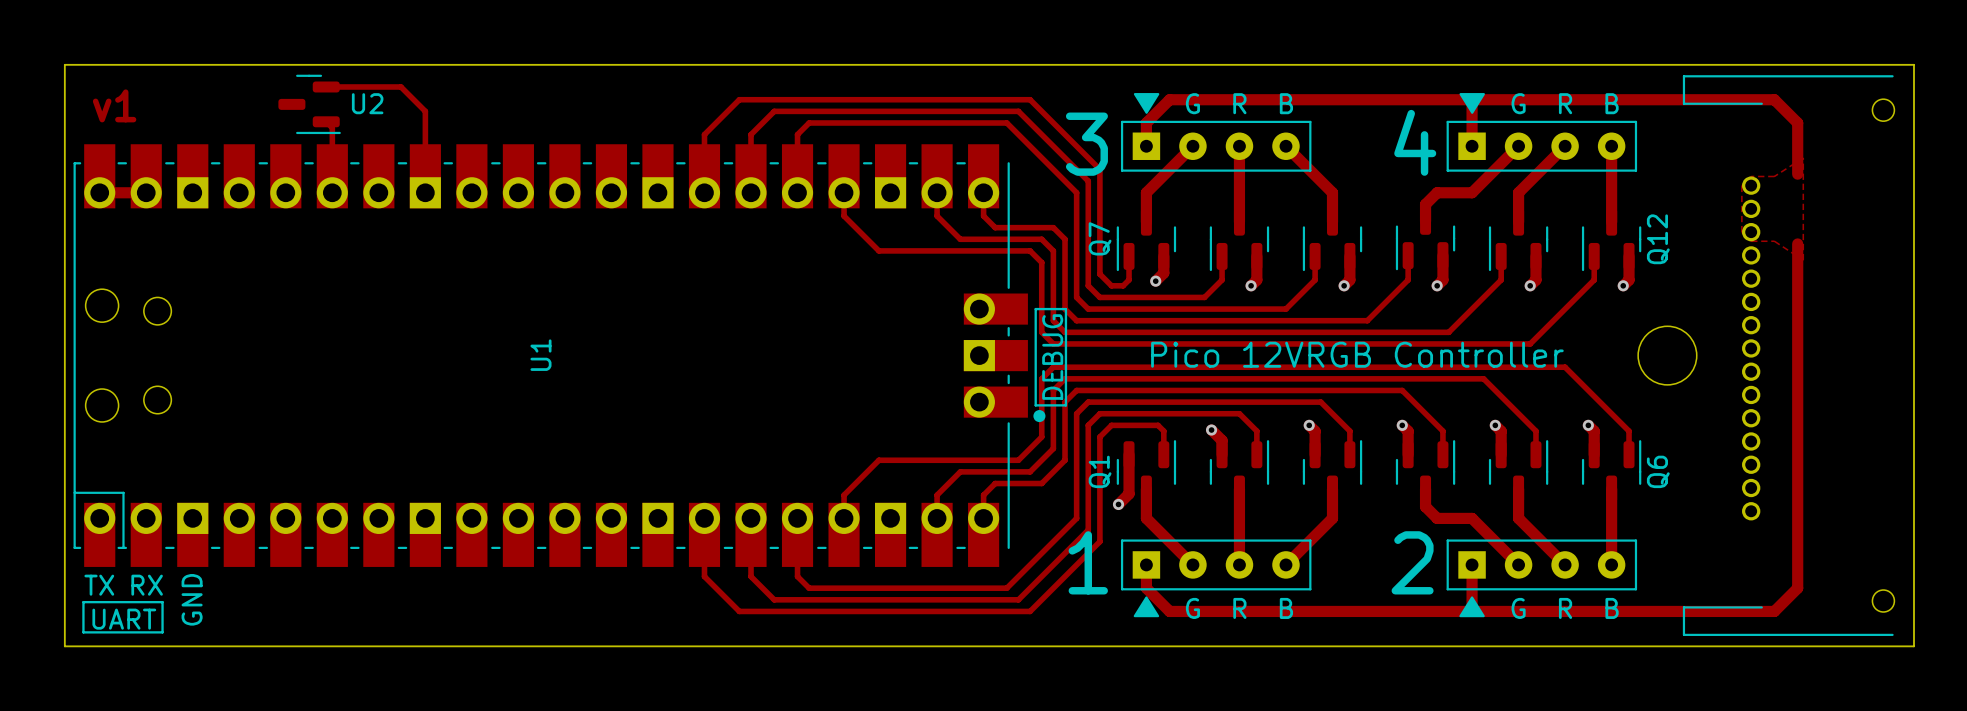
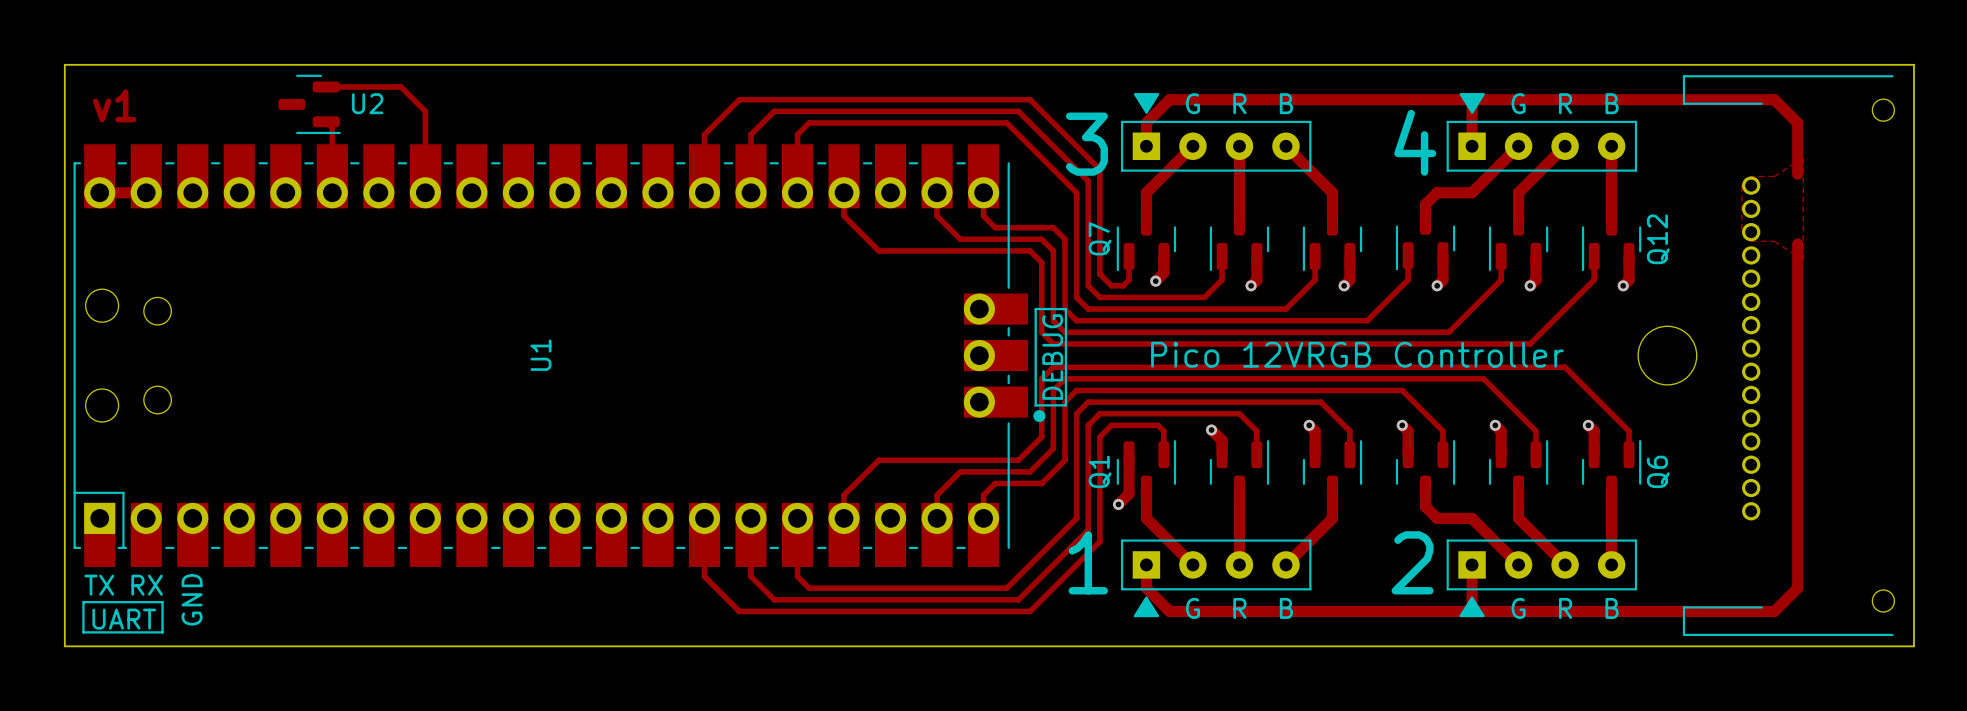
U1 footprint: [73, 144, 1028, 567] -> [73, 144, 1028, 567]

